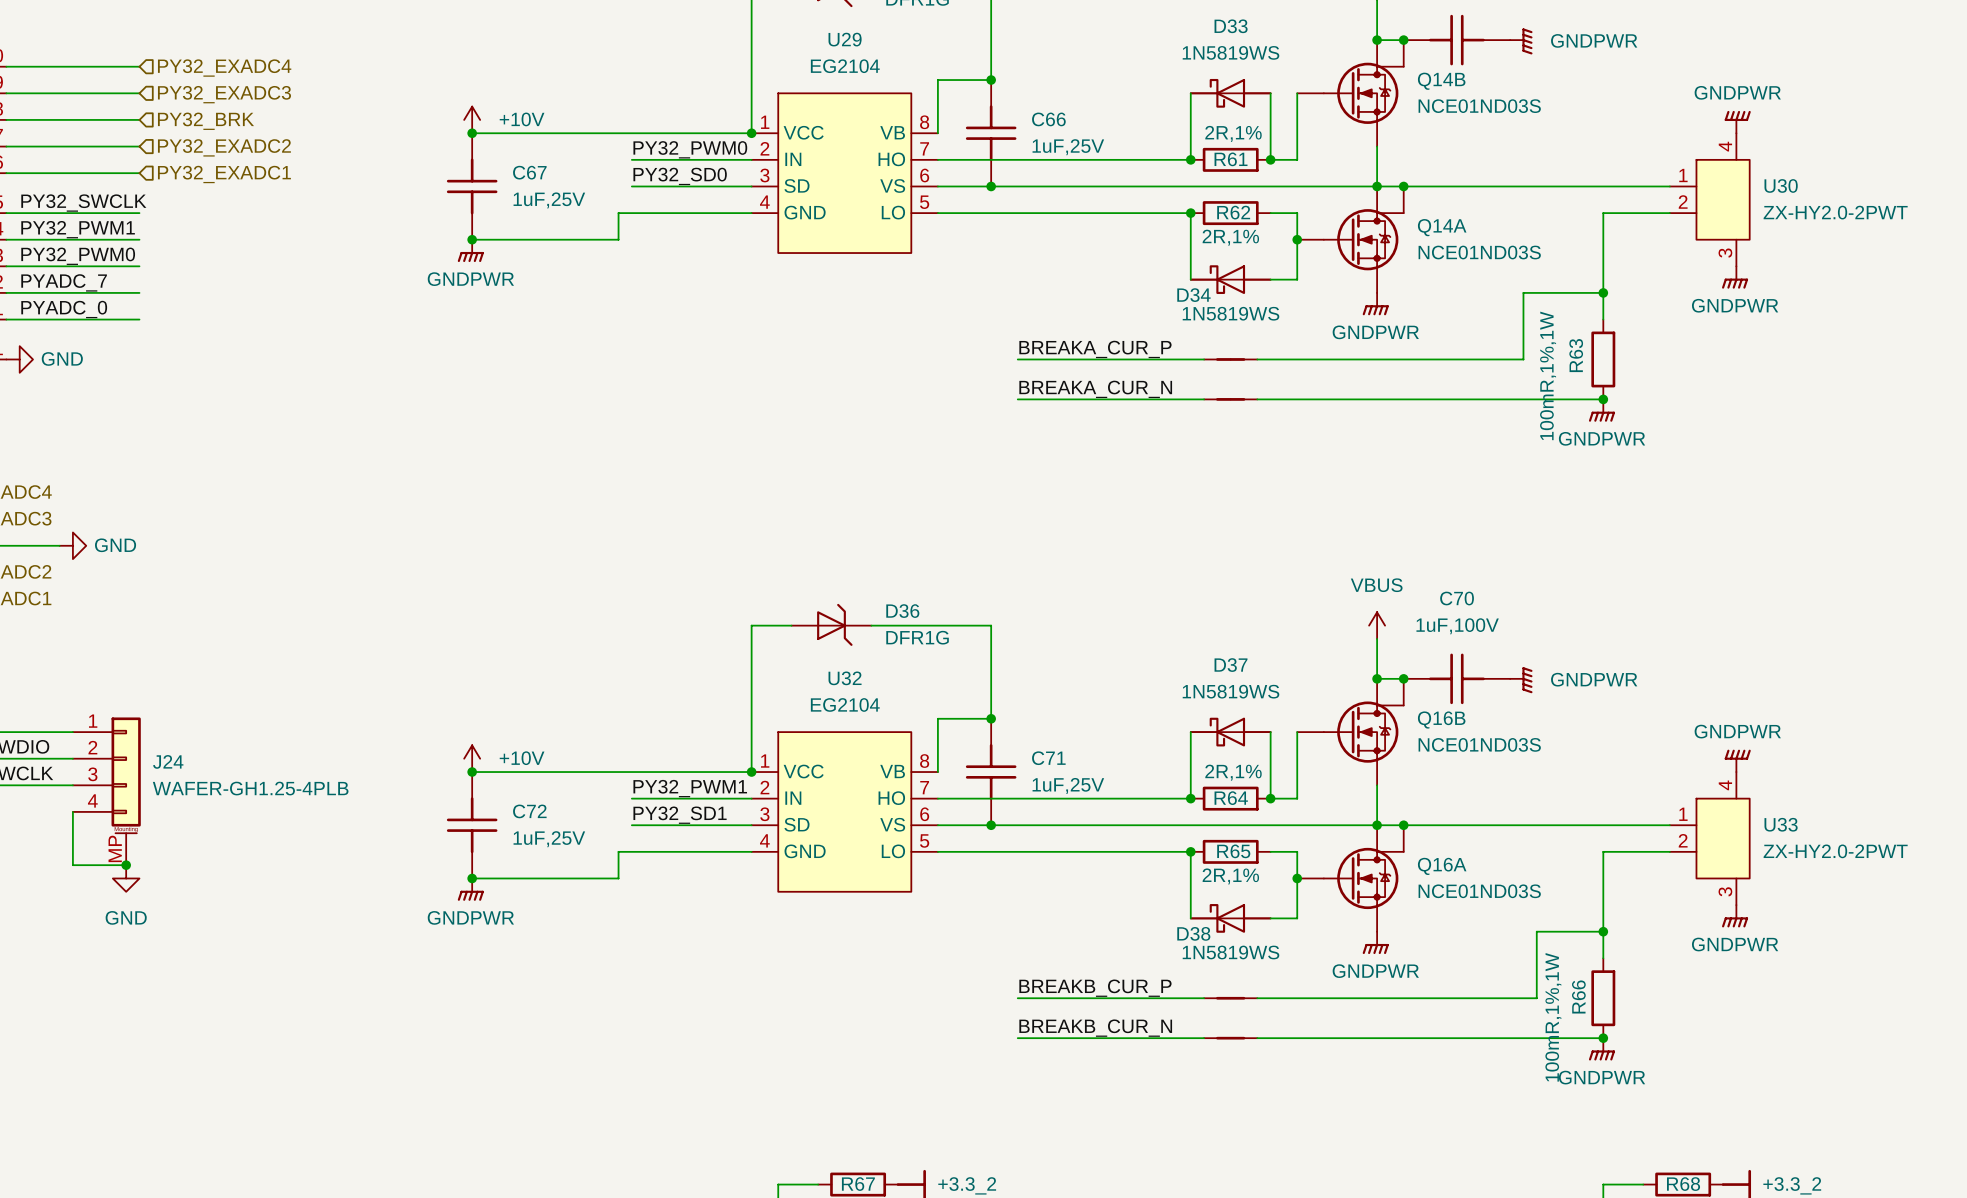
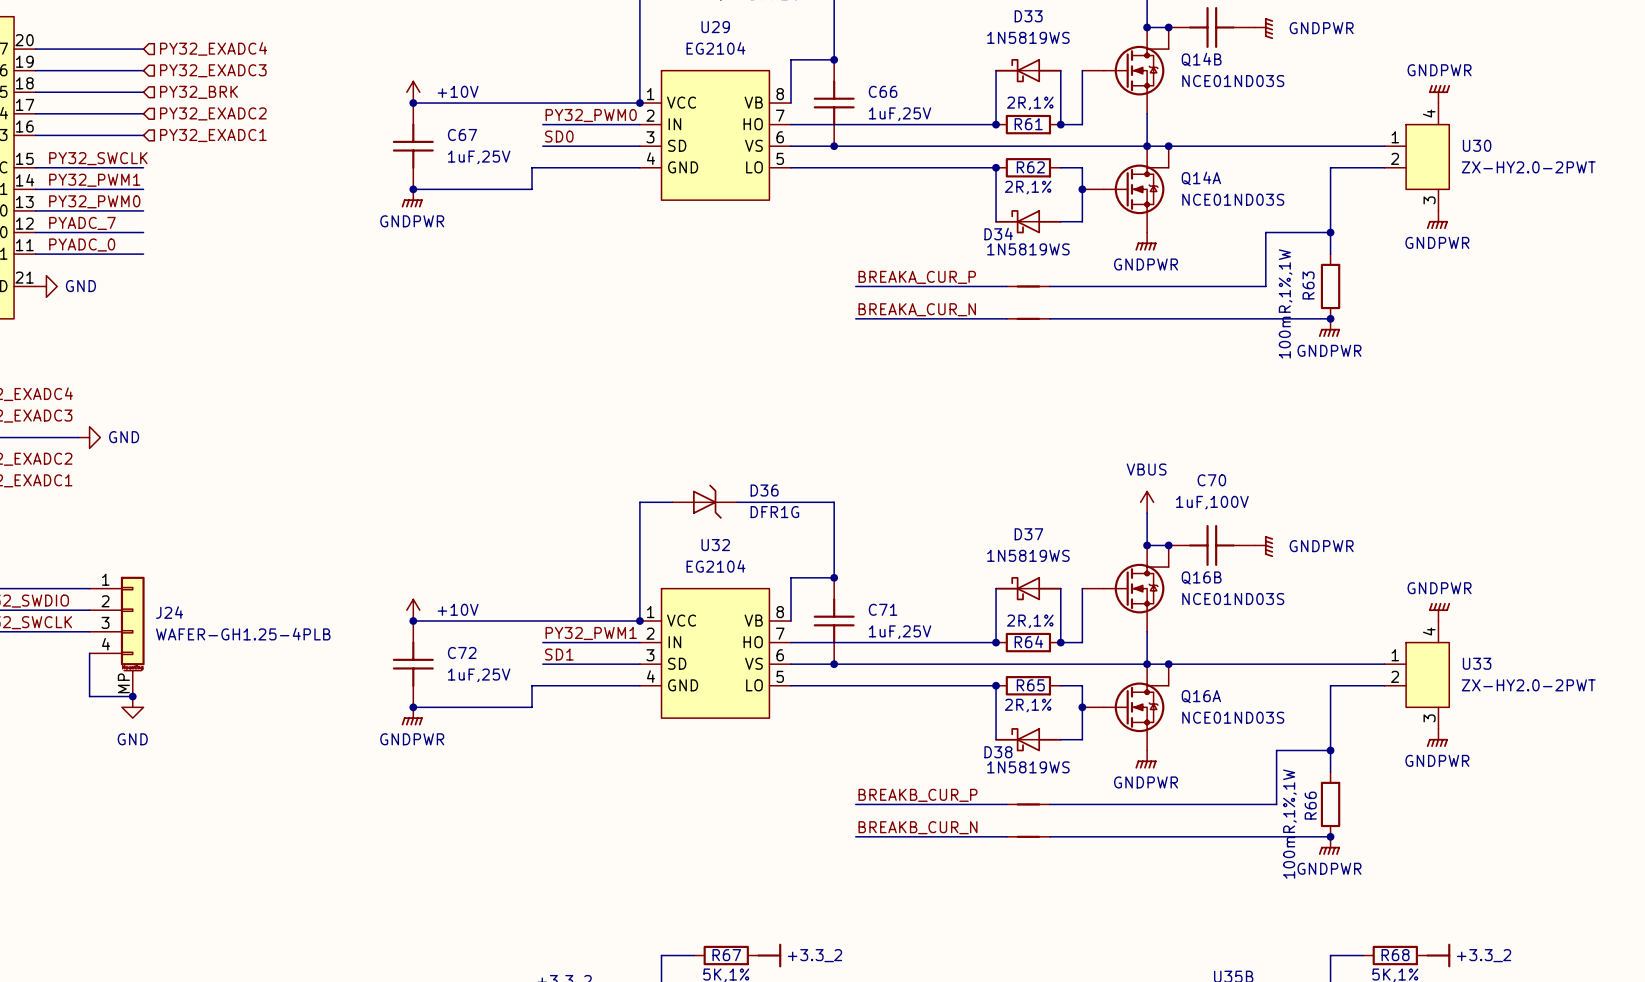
label: PY32_SD0 (680, 176) -> SD0 (559, 136)
label: PY32_SD1 (680, 815) -> SD1 (559, 654)

